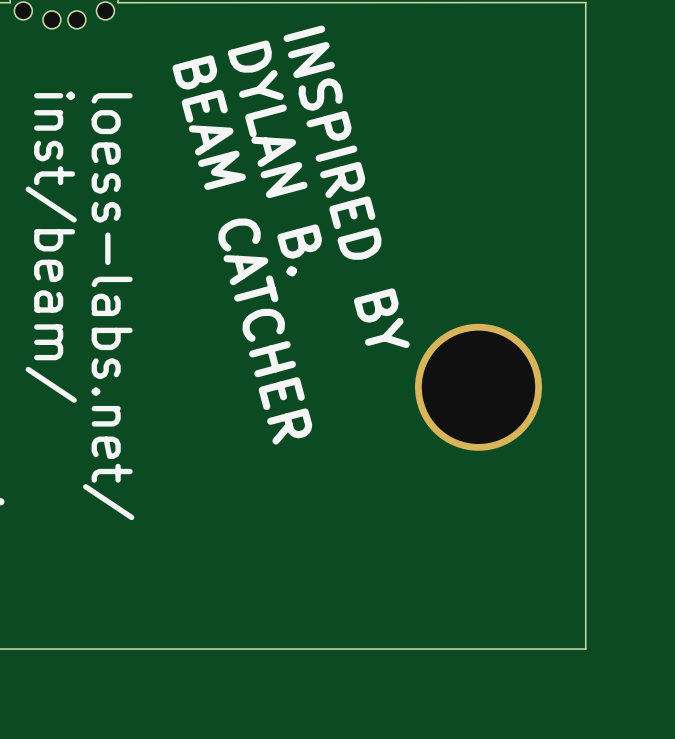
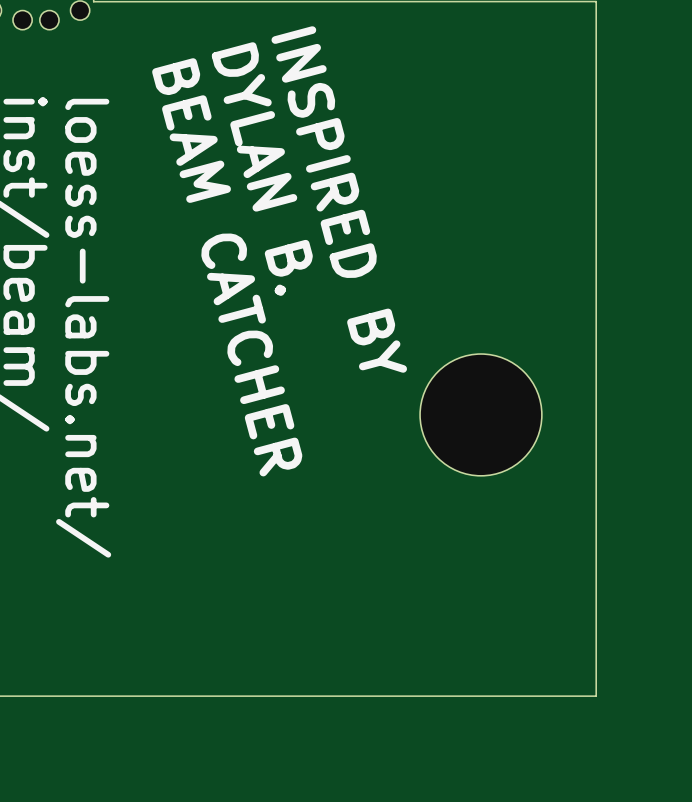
part footprint: [415, 323, 542, 451] -> [420, 354, 542, 476]

